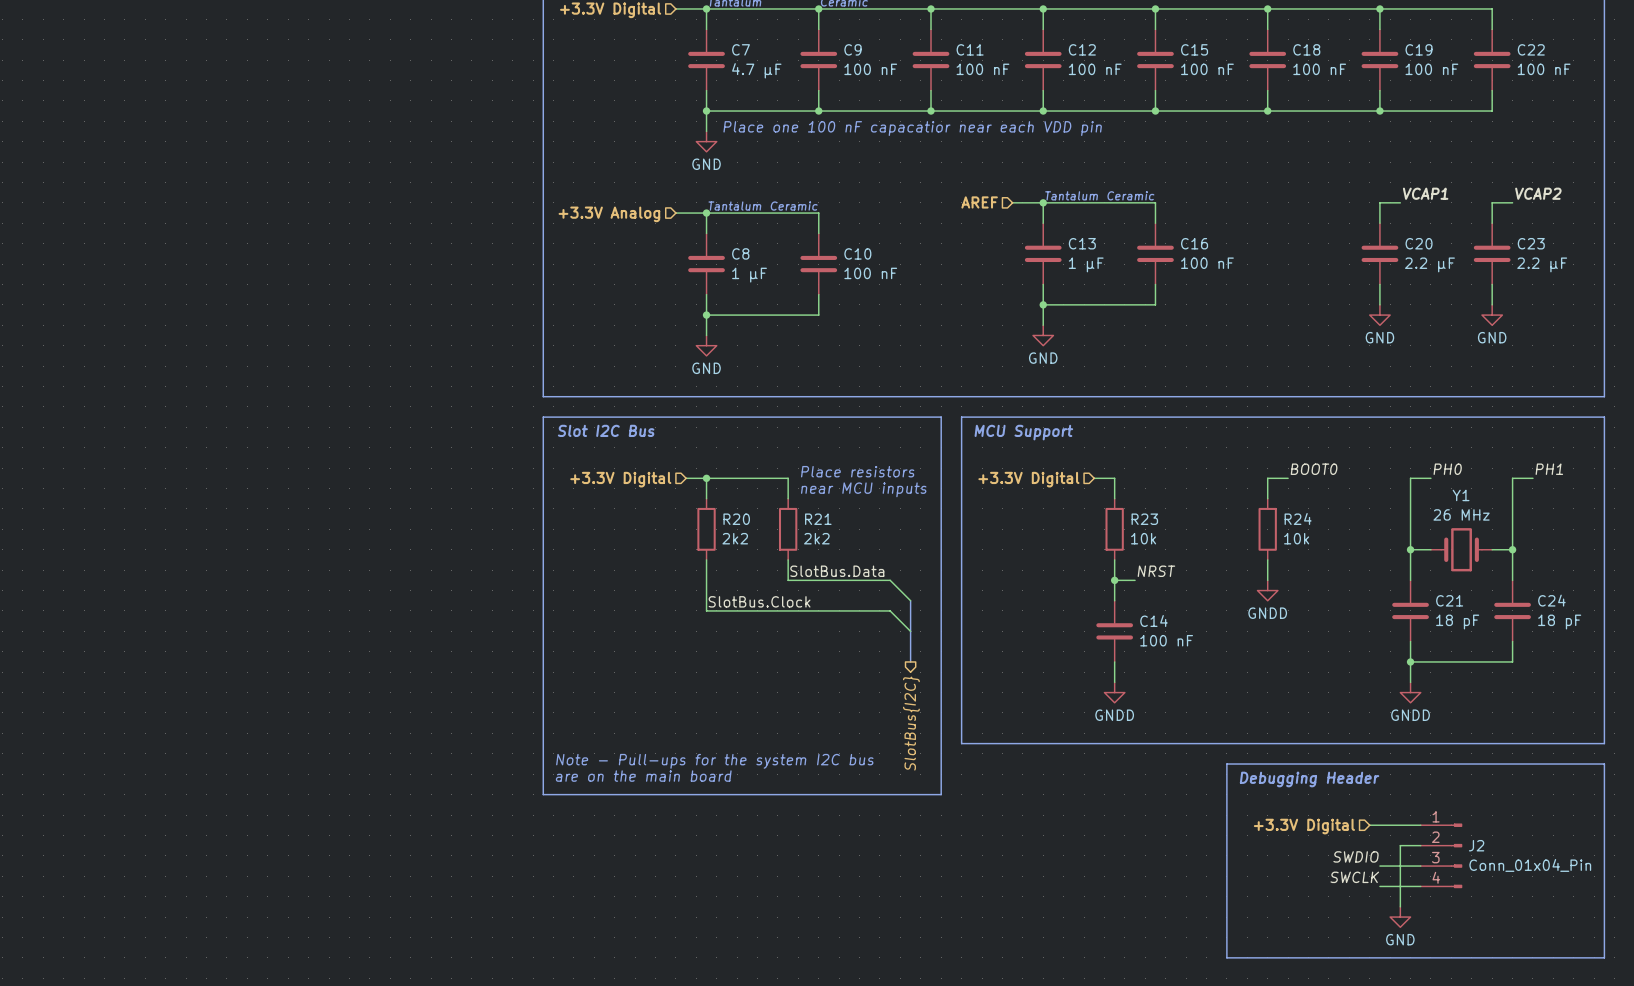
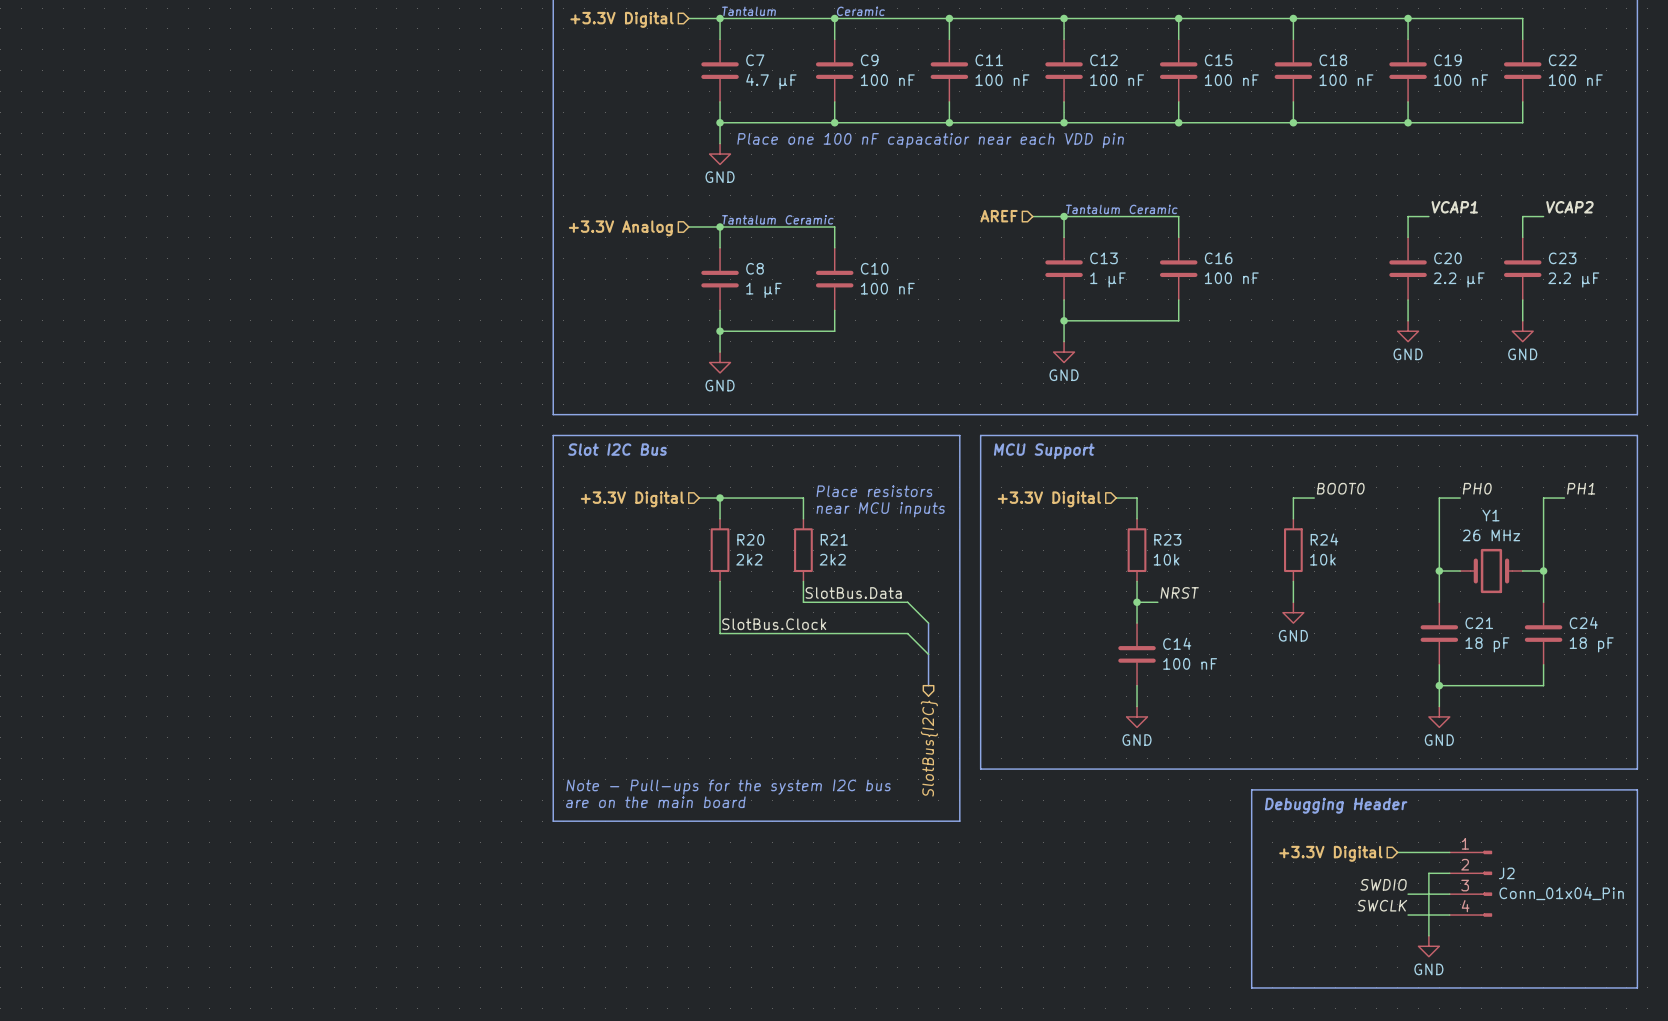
power symbol: GNDD (1267, 590) -> GND (1293, 612)
power symbol: GNDD (1114, 692) -> GND (1137, 716)
power symbol: GNDD (1410, 692) -> GND (1439, 716)

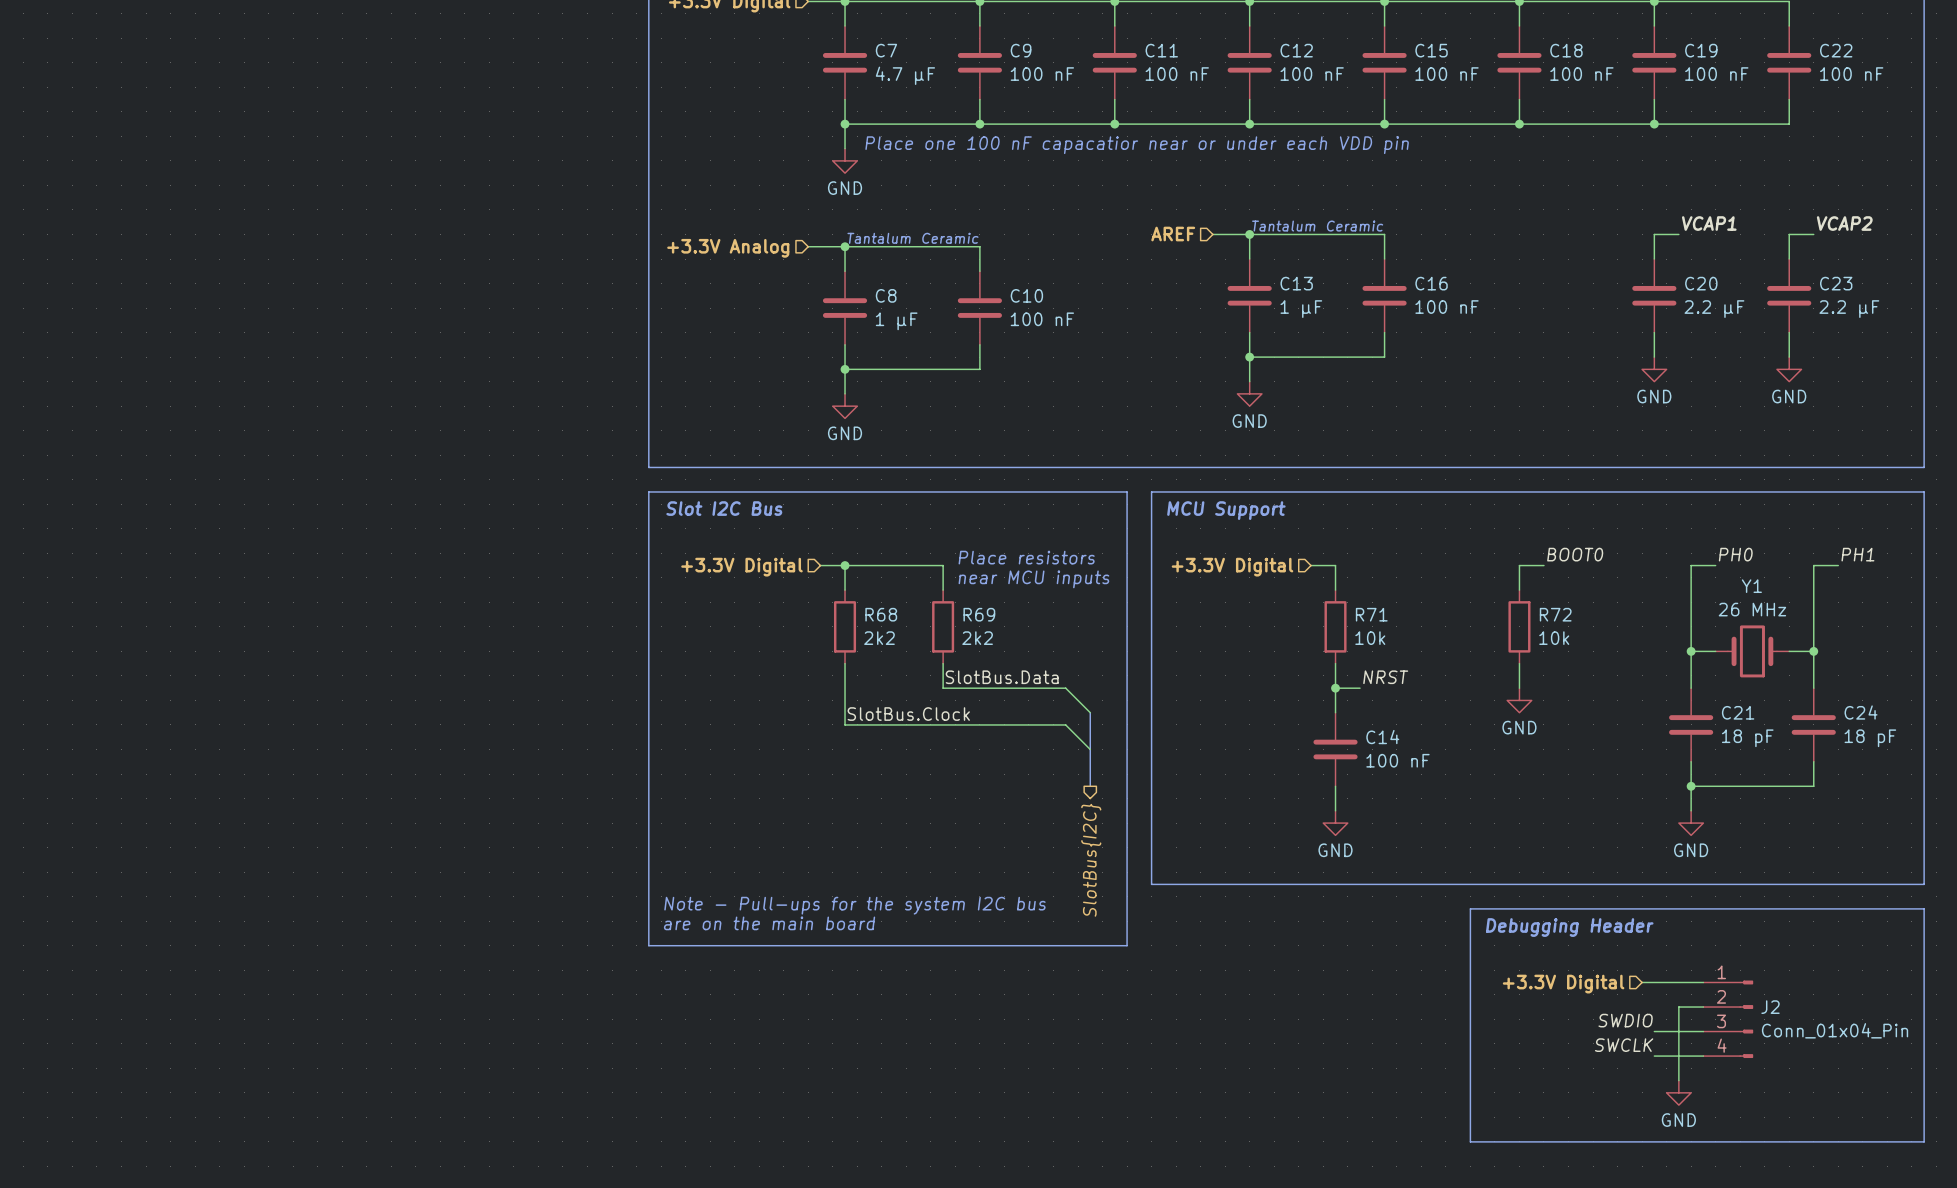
text: Place one 100 nF capacatior near each VDD pin (930, 140) -> Place one 100 nF capacatior near or under each VDD pin (1137, 145)
R20 name: R20 (750, 539) -> R68 (881, 614)
R21 name: R21 (834, 539) -> R69 (979, 614)
R23 name: R23 (1167, 539) -> R71 (1371, 614)
R24 name: R24 (1324, 539) -> R72 (1555, 614)

